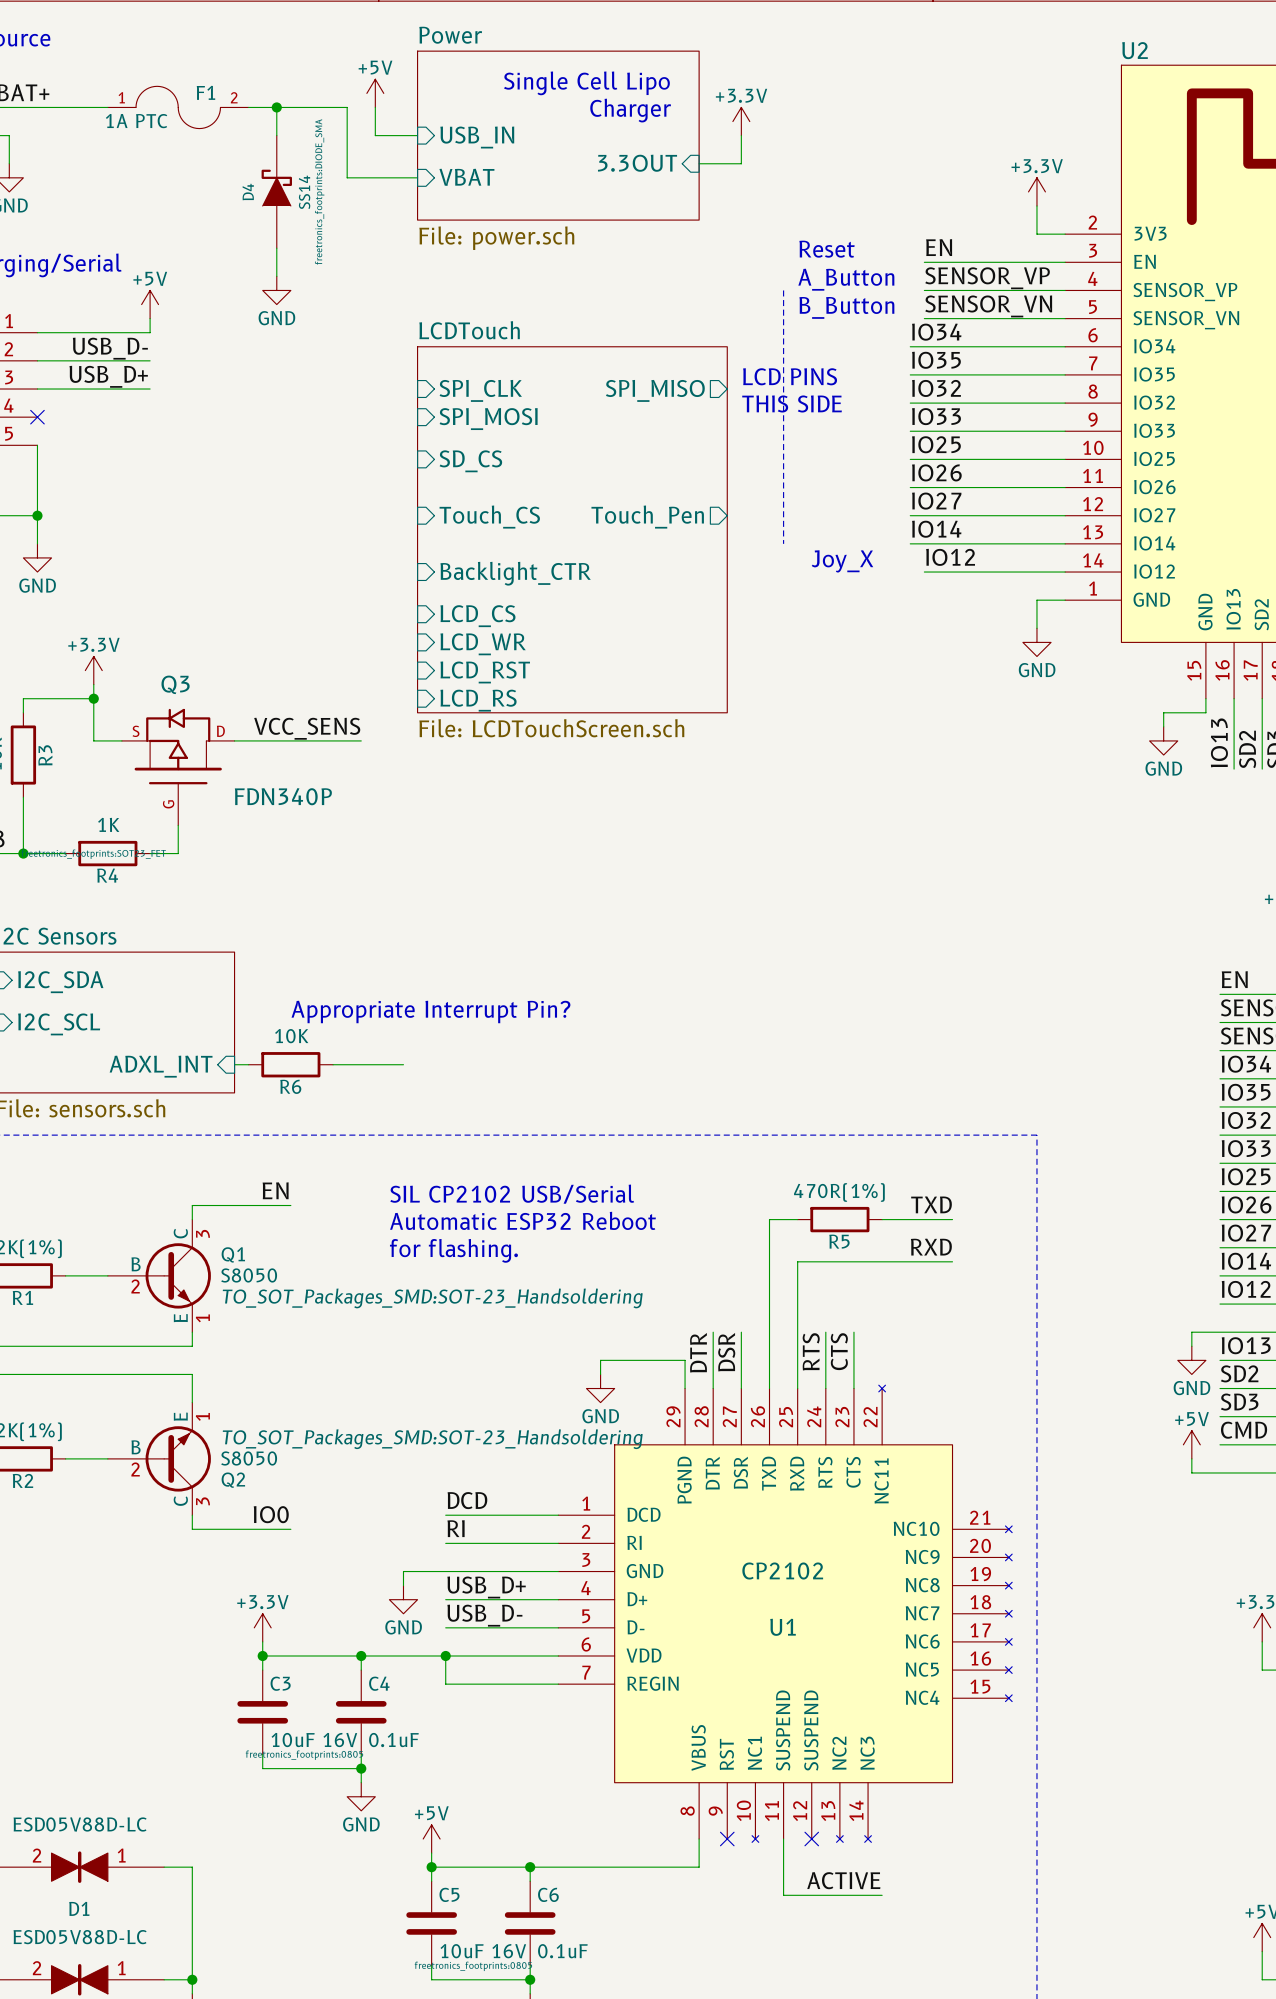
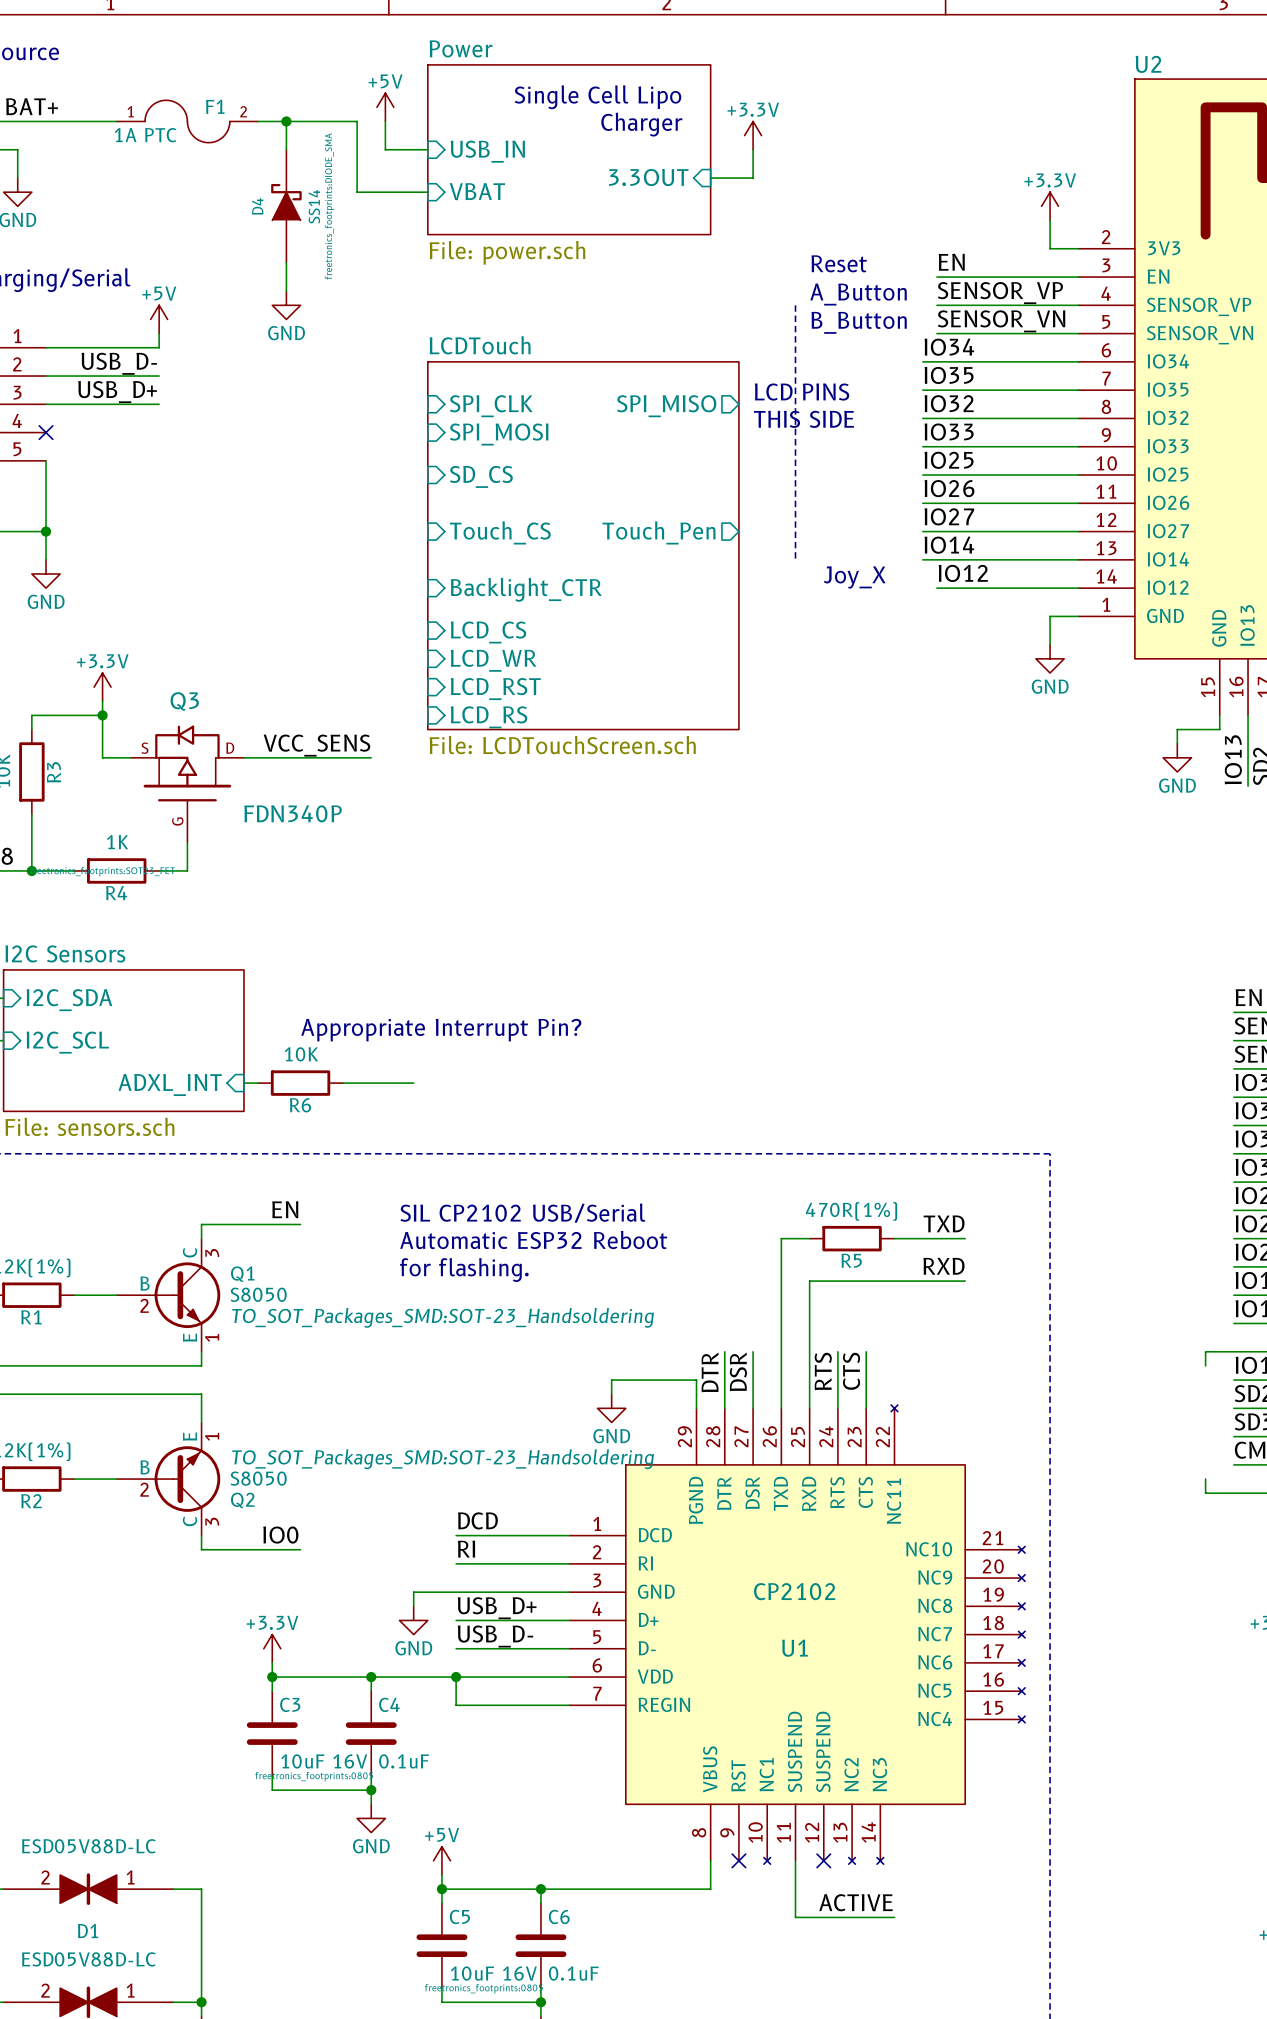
power symbol: GND (1191, 1360) -> none
power symbol: +5V (1191, 1444) -> none

